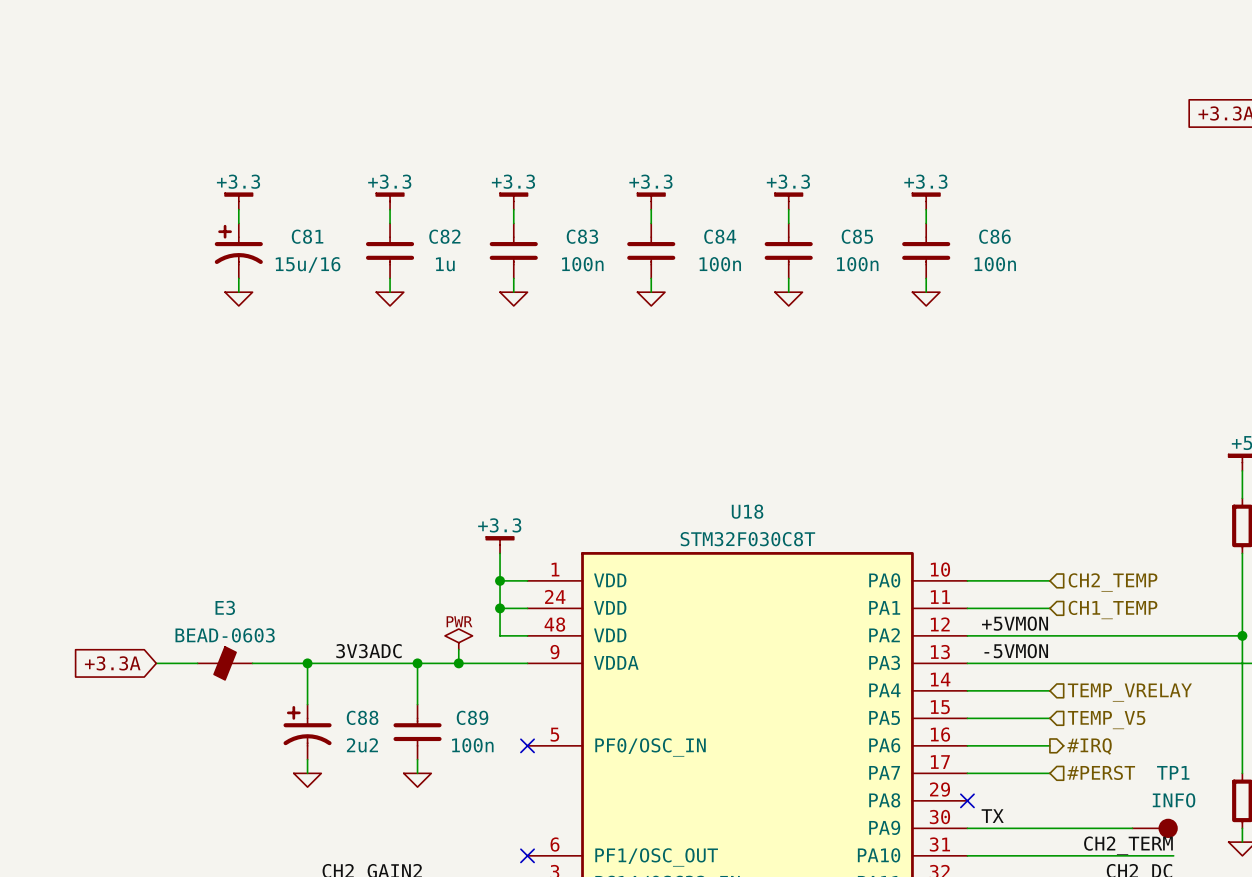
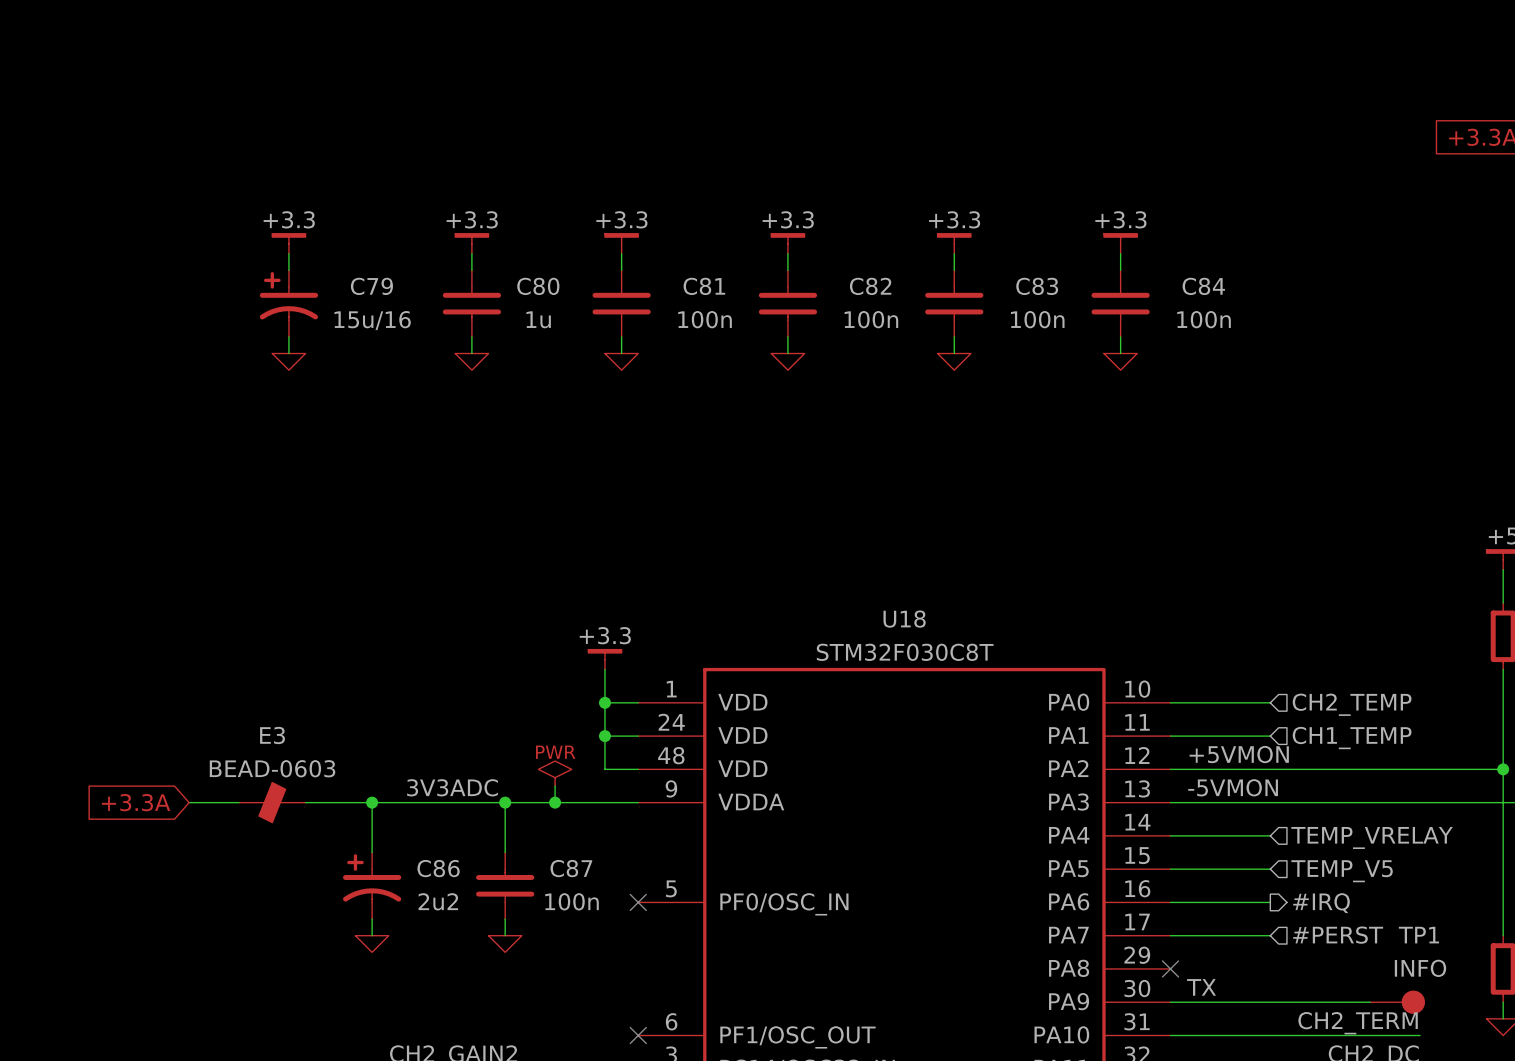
C81 name: C81 (307, 236) -> C79 (371, 286)
C82 name: C82 (444, 236) -> C80 (538, 286)
C83 name: C83 (582, 236) -> C81 (704, 286)
C84 name: C84 (720, 236) -> C82 (870, 286)
C85 name: C85 (857, 236) -> C83 (1037, 286)
C86 name: C86 (994, 236) -> C84 (1203, 286)
C88 name: C88 (362, 717) -> C86 (438, 868)
C89 name: C89 (472, 717) -> C87 (571, 868)

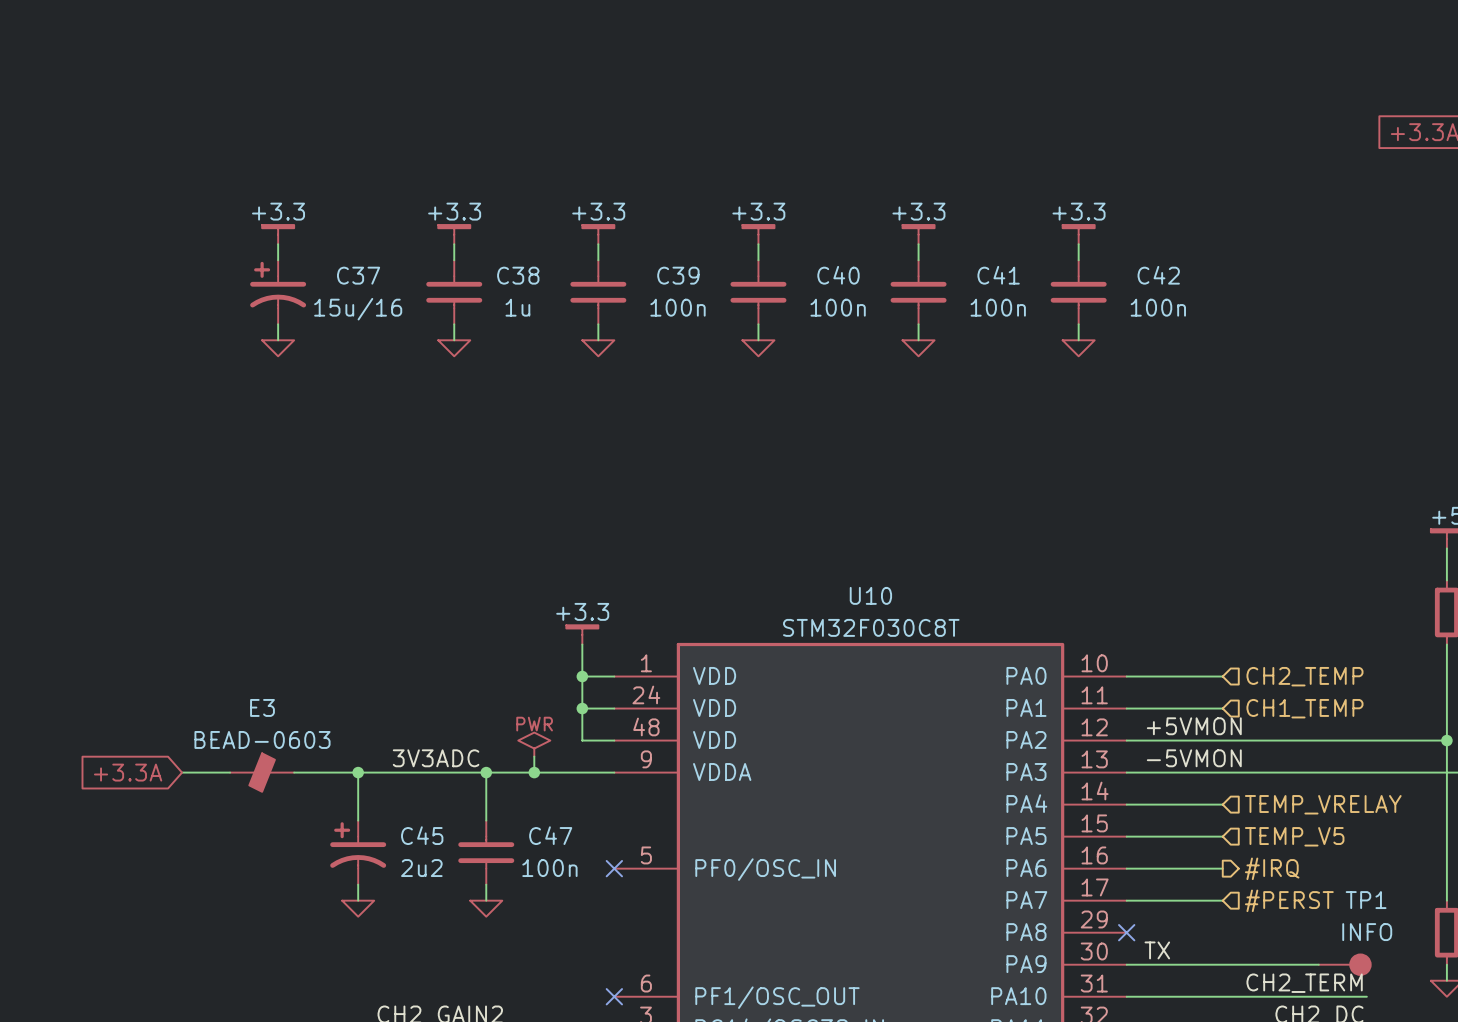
C79 name: C79 (371, 286) -> C37 (358, 275)
C80 name: C80 (538, 286) -> C38 (518, 275)
C81 name: C81 (704, 286) -> C39 (678, 275)
C82 name: C82 (870, 286) -> C40 (838, 275)
C83 name: C83 (1037, 286) -> C41 (998, 275)
C84 name: C84 (1203, 286) -> C42 (1158, 275)
U18 name: U18 (904, 619) -> U10 (870, 595)
C86 name: C86 (438, 868) -> C45 (422, 835)
C87 name: C87 (571, 868) -> C47 (550, 835)

